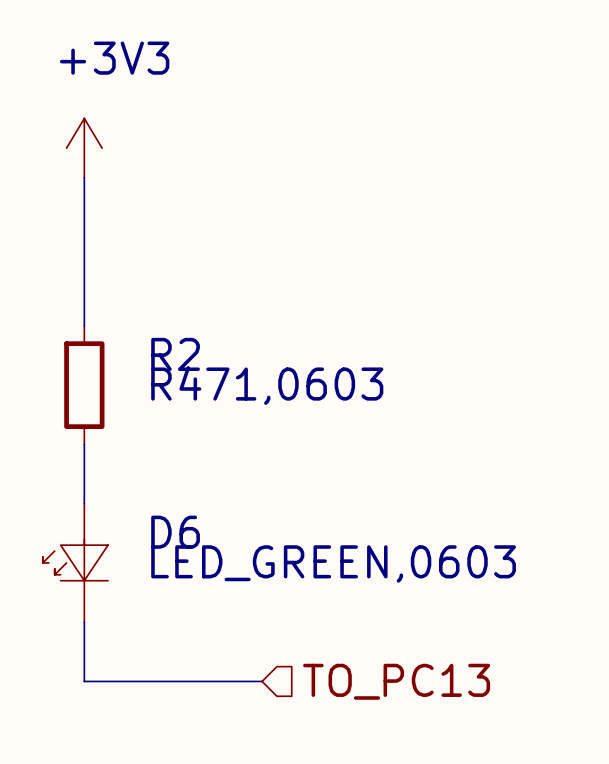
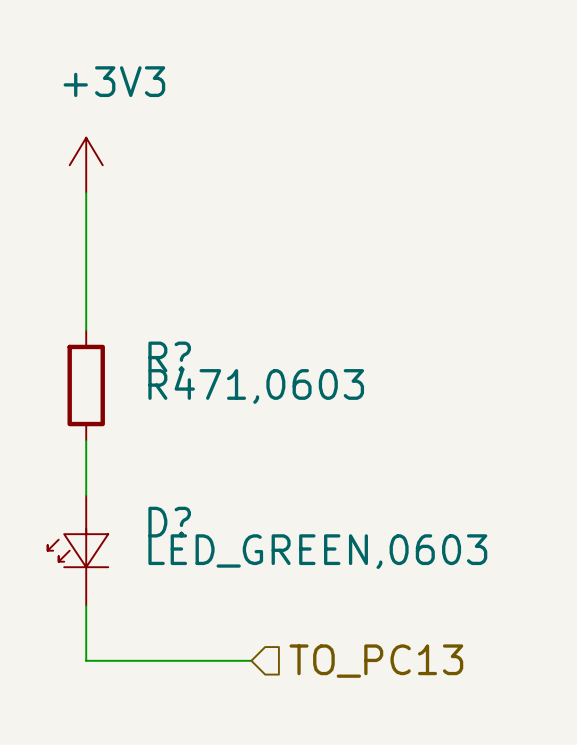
R2 name: R2 (175, 354) -> R? (169, 356)
D6 name: D6 (175, 532) -> D? (169, 522)

